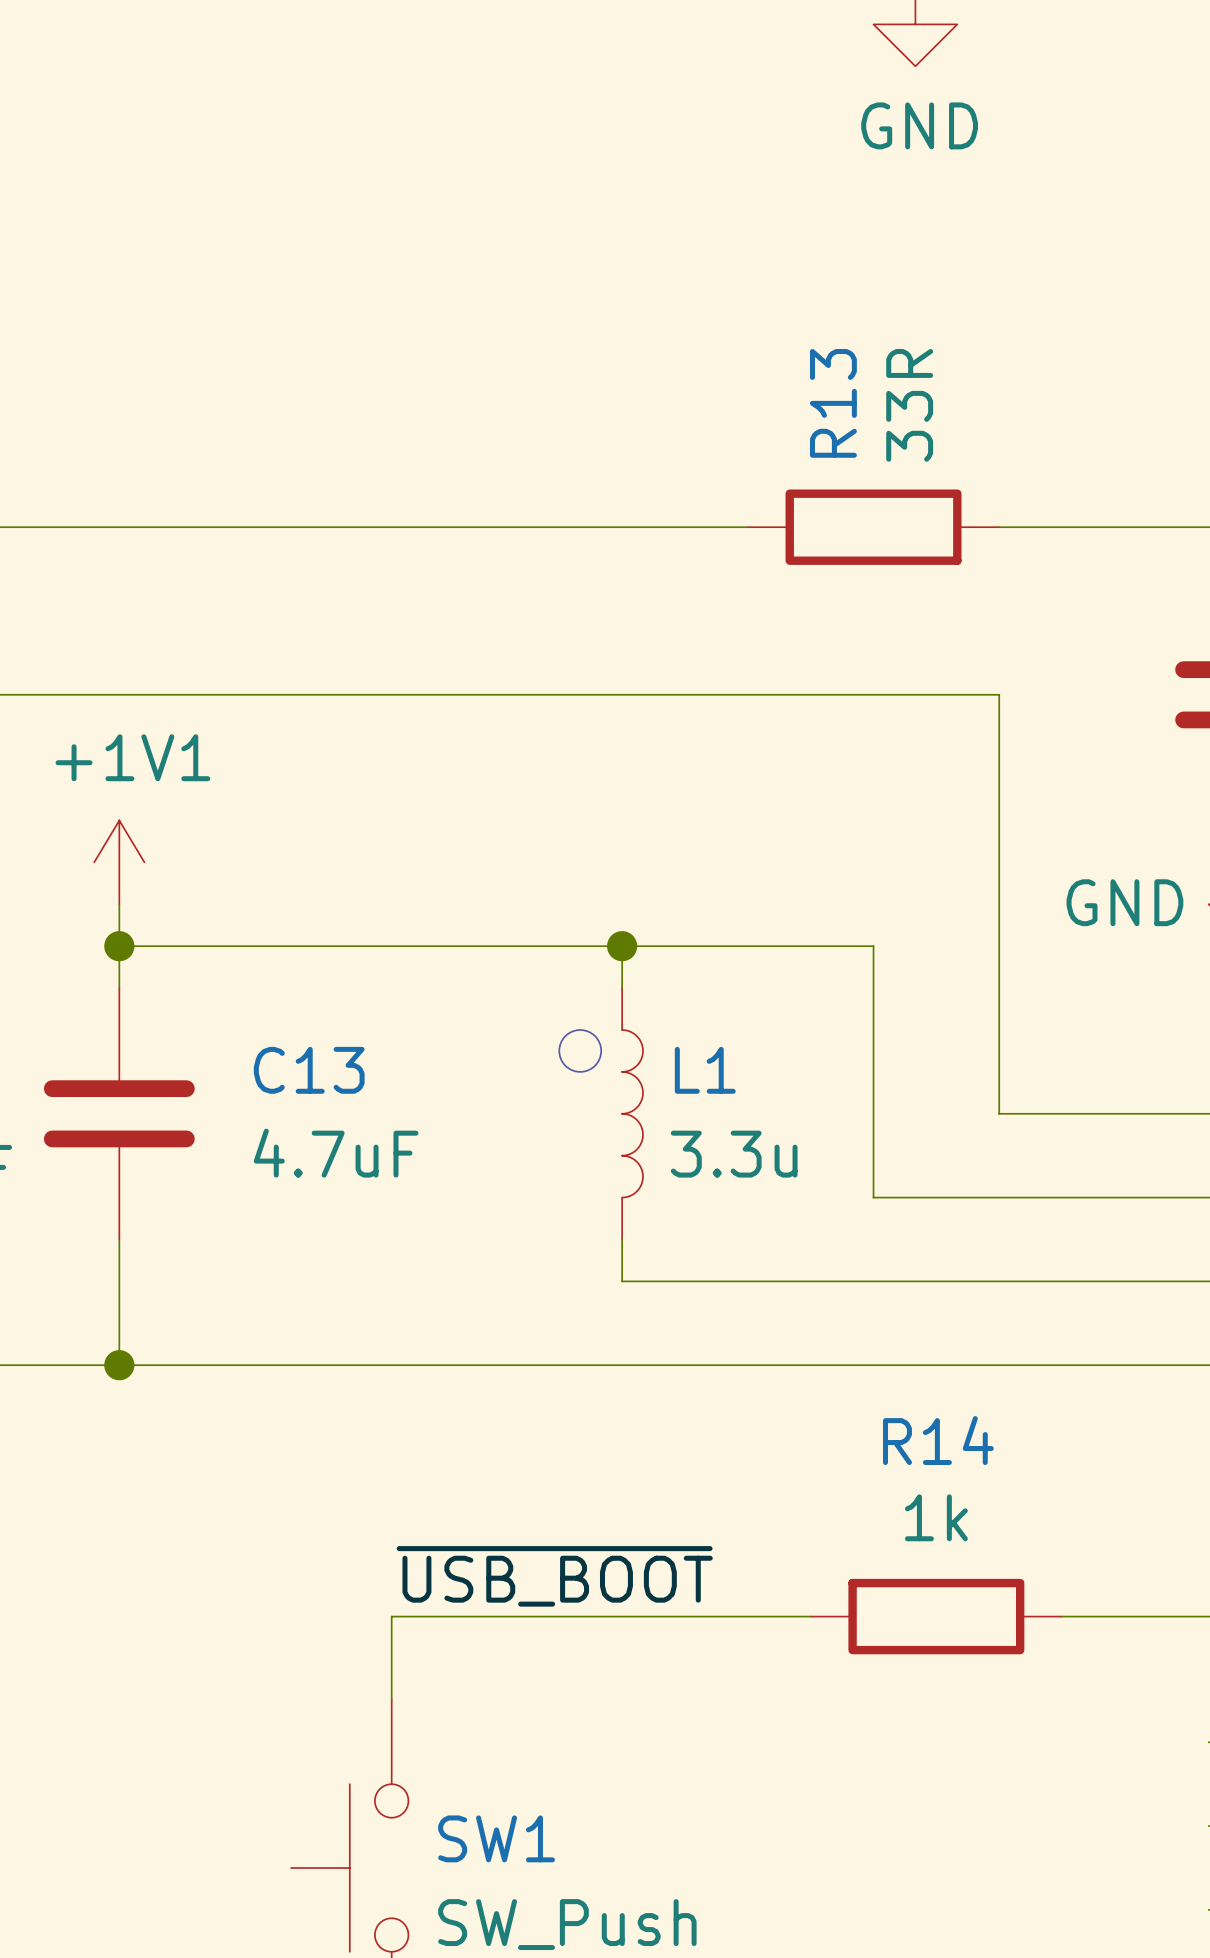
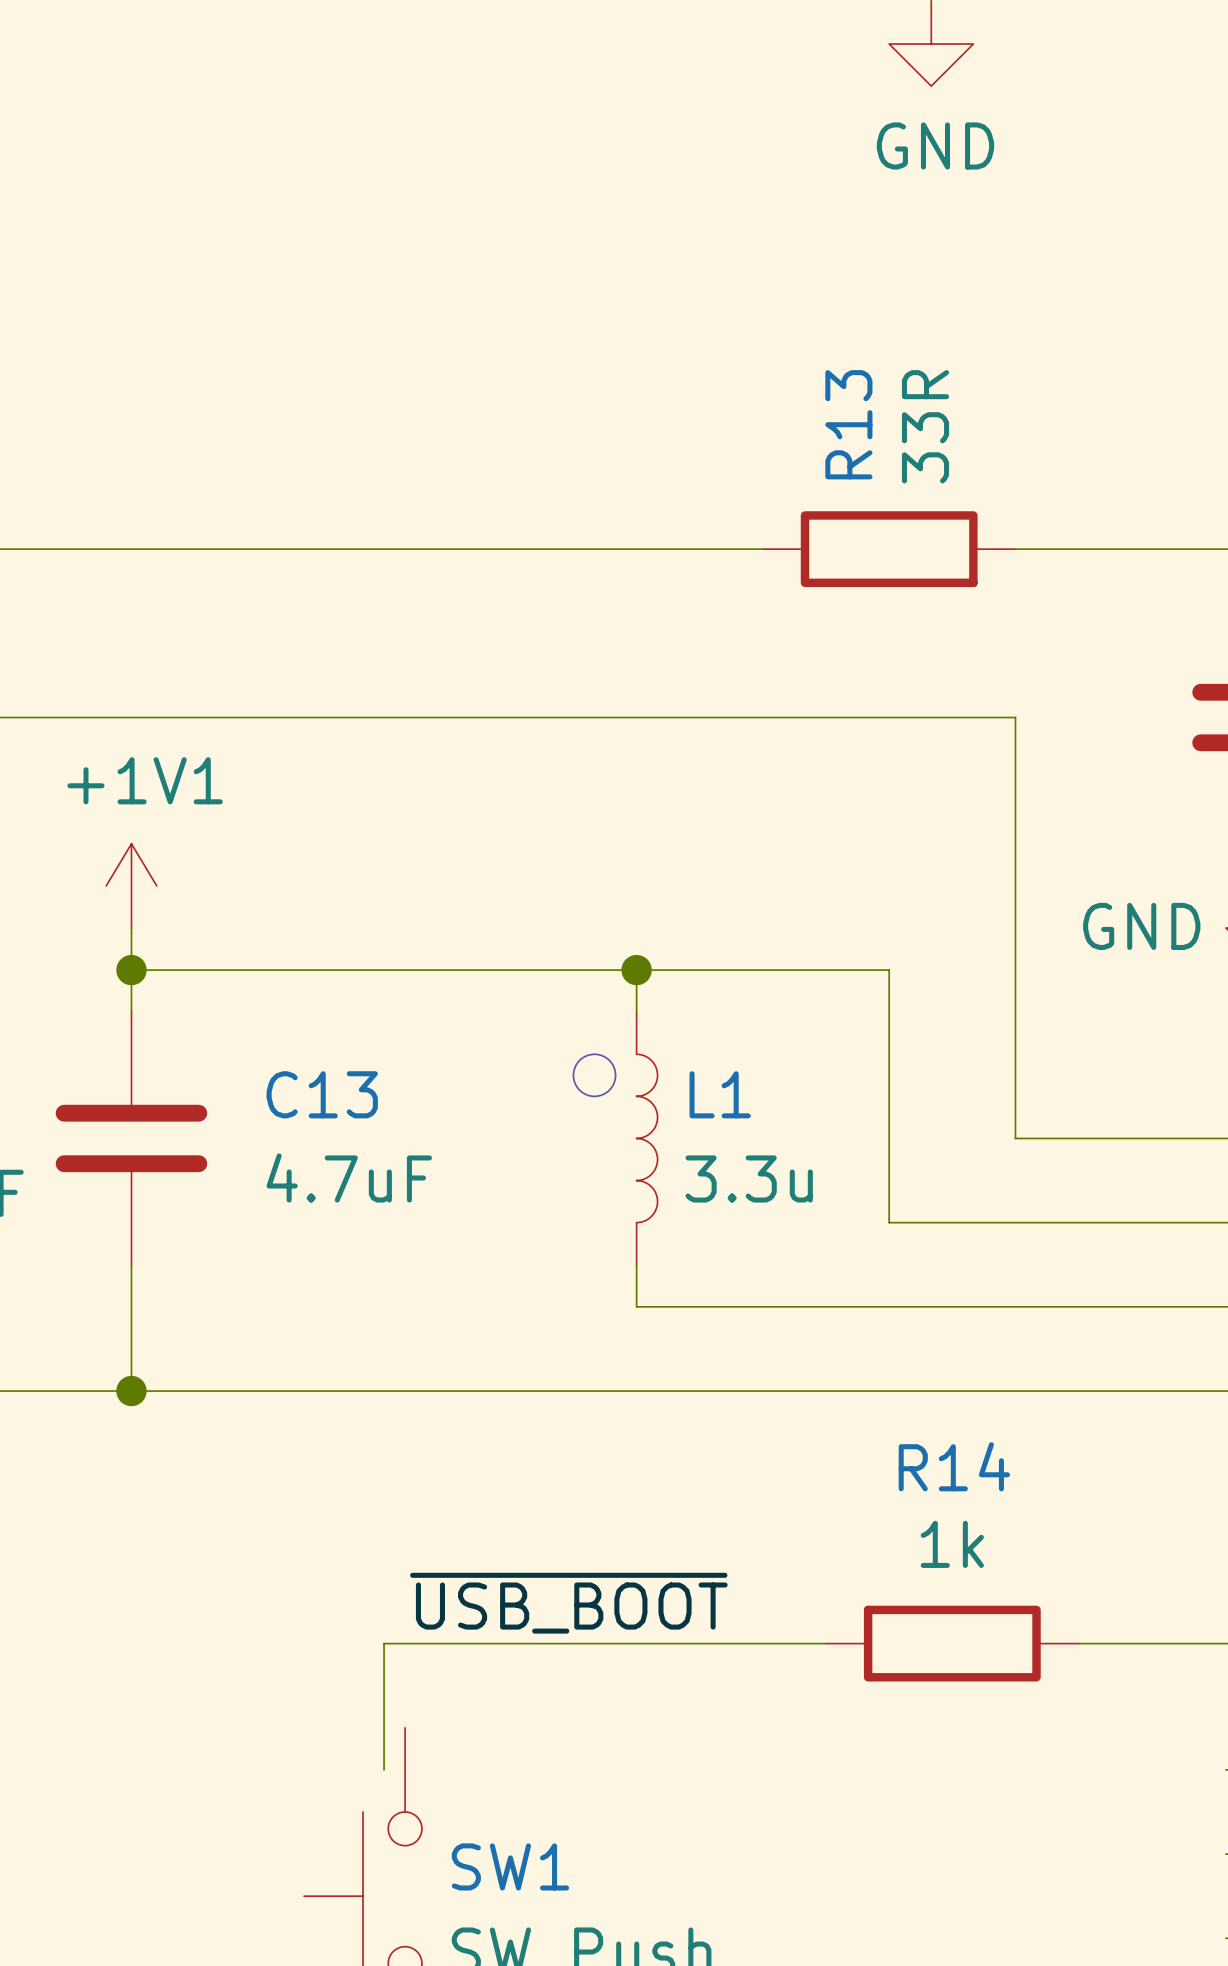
wire: (391, 1616) (391, 1700) -> (405, 1643) (384, 1643) (384, 1769)

